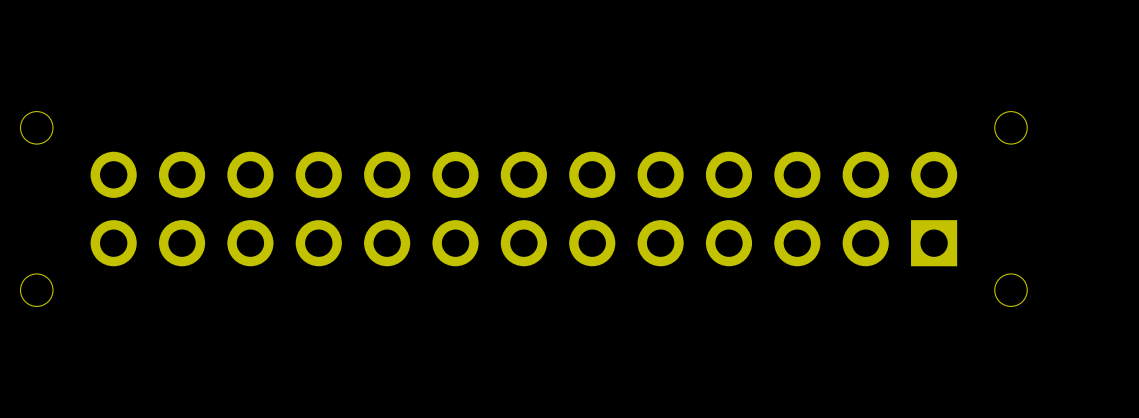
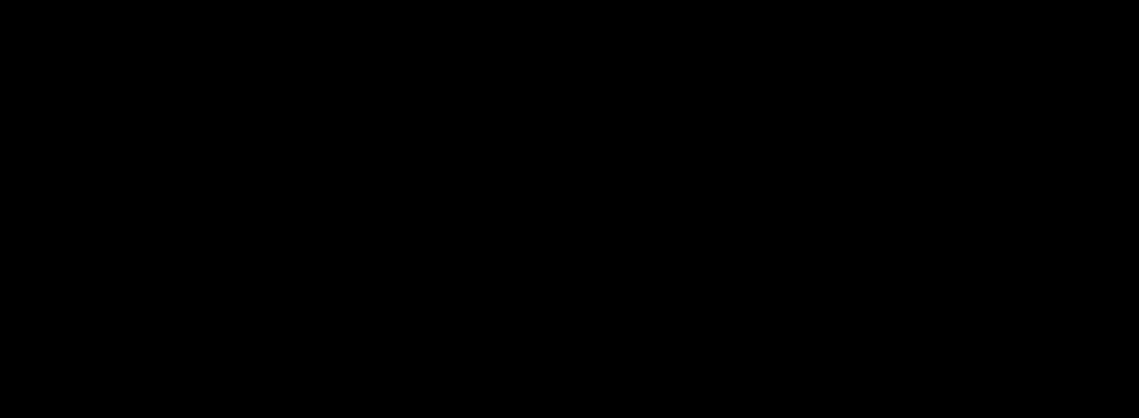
part: (523, 209) -> none

